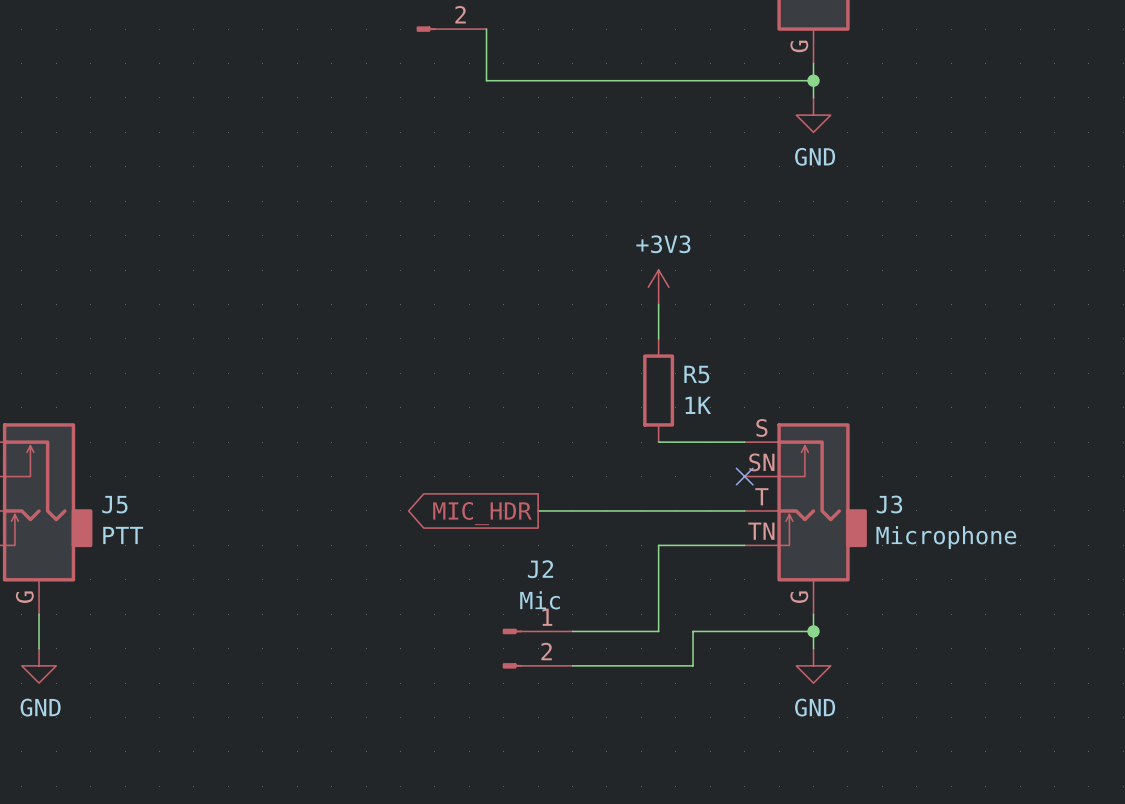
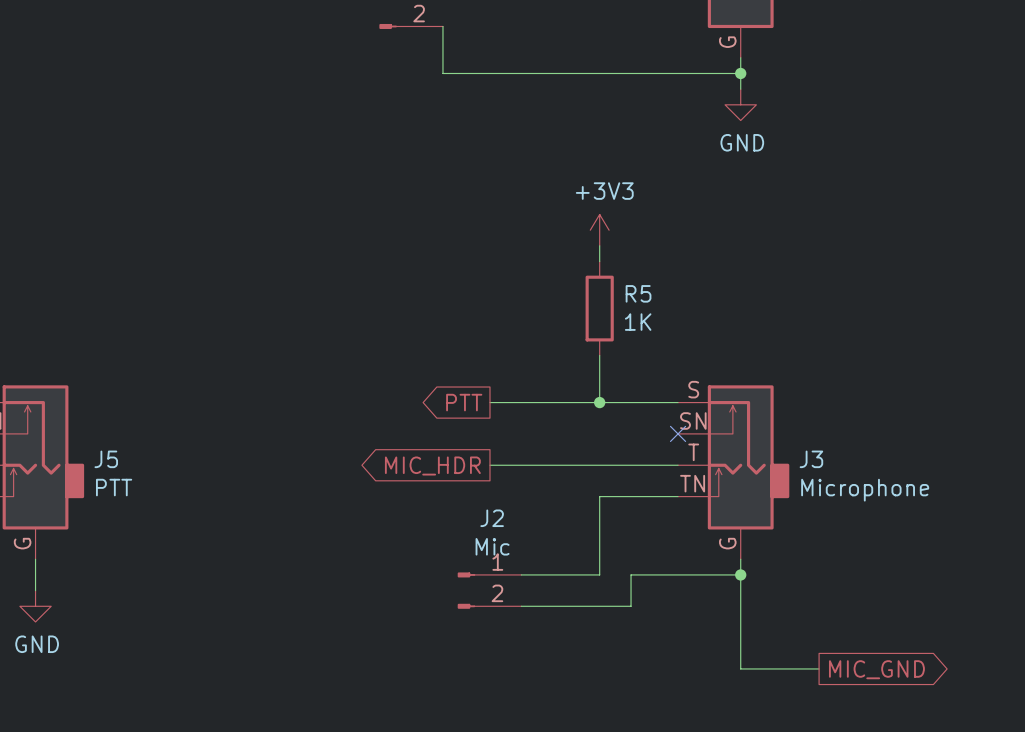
power symbol position: +3V3 (658, 287) -> +3V3 (599, 230)
wire: (658, 304) (658, 338) -> none
wire: none -> (599, 355) (599, 402) (489, 402)
R5 position: (658, 390) -> (599, 308)
global label: none -> PTT (464, 402)
junction: none -> (599, 402)
wire: none -> (740, 590) (740, 668) (819, 668)
power symbol: GND (813, 665) -> none
global label: none -> MIC_GND (876, 669)

